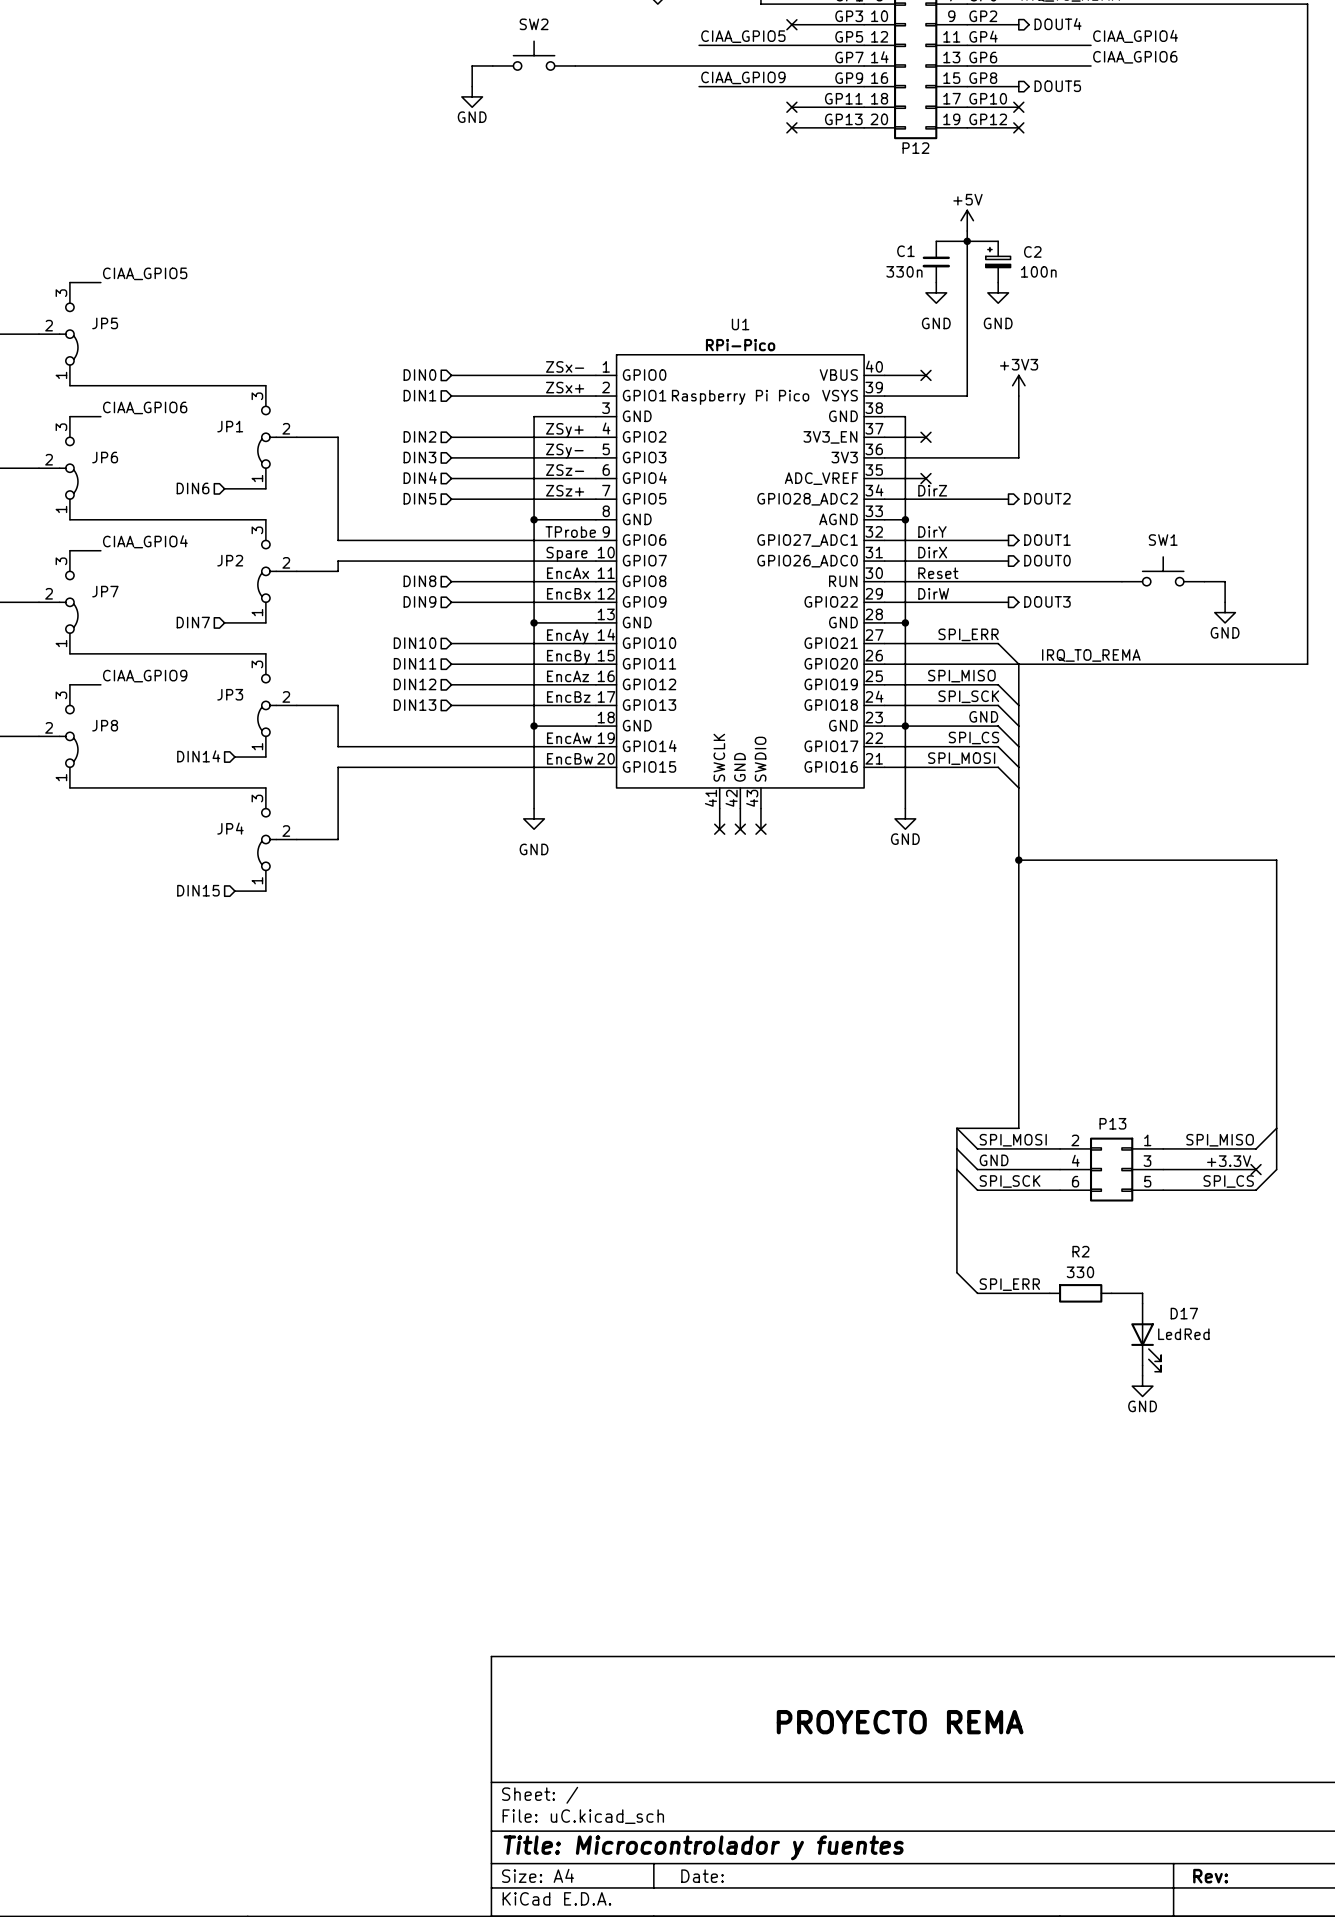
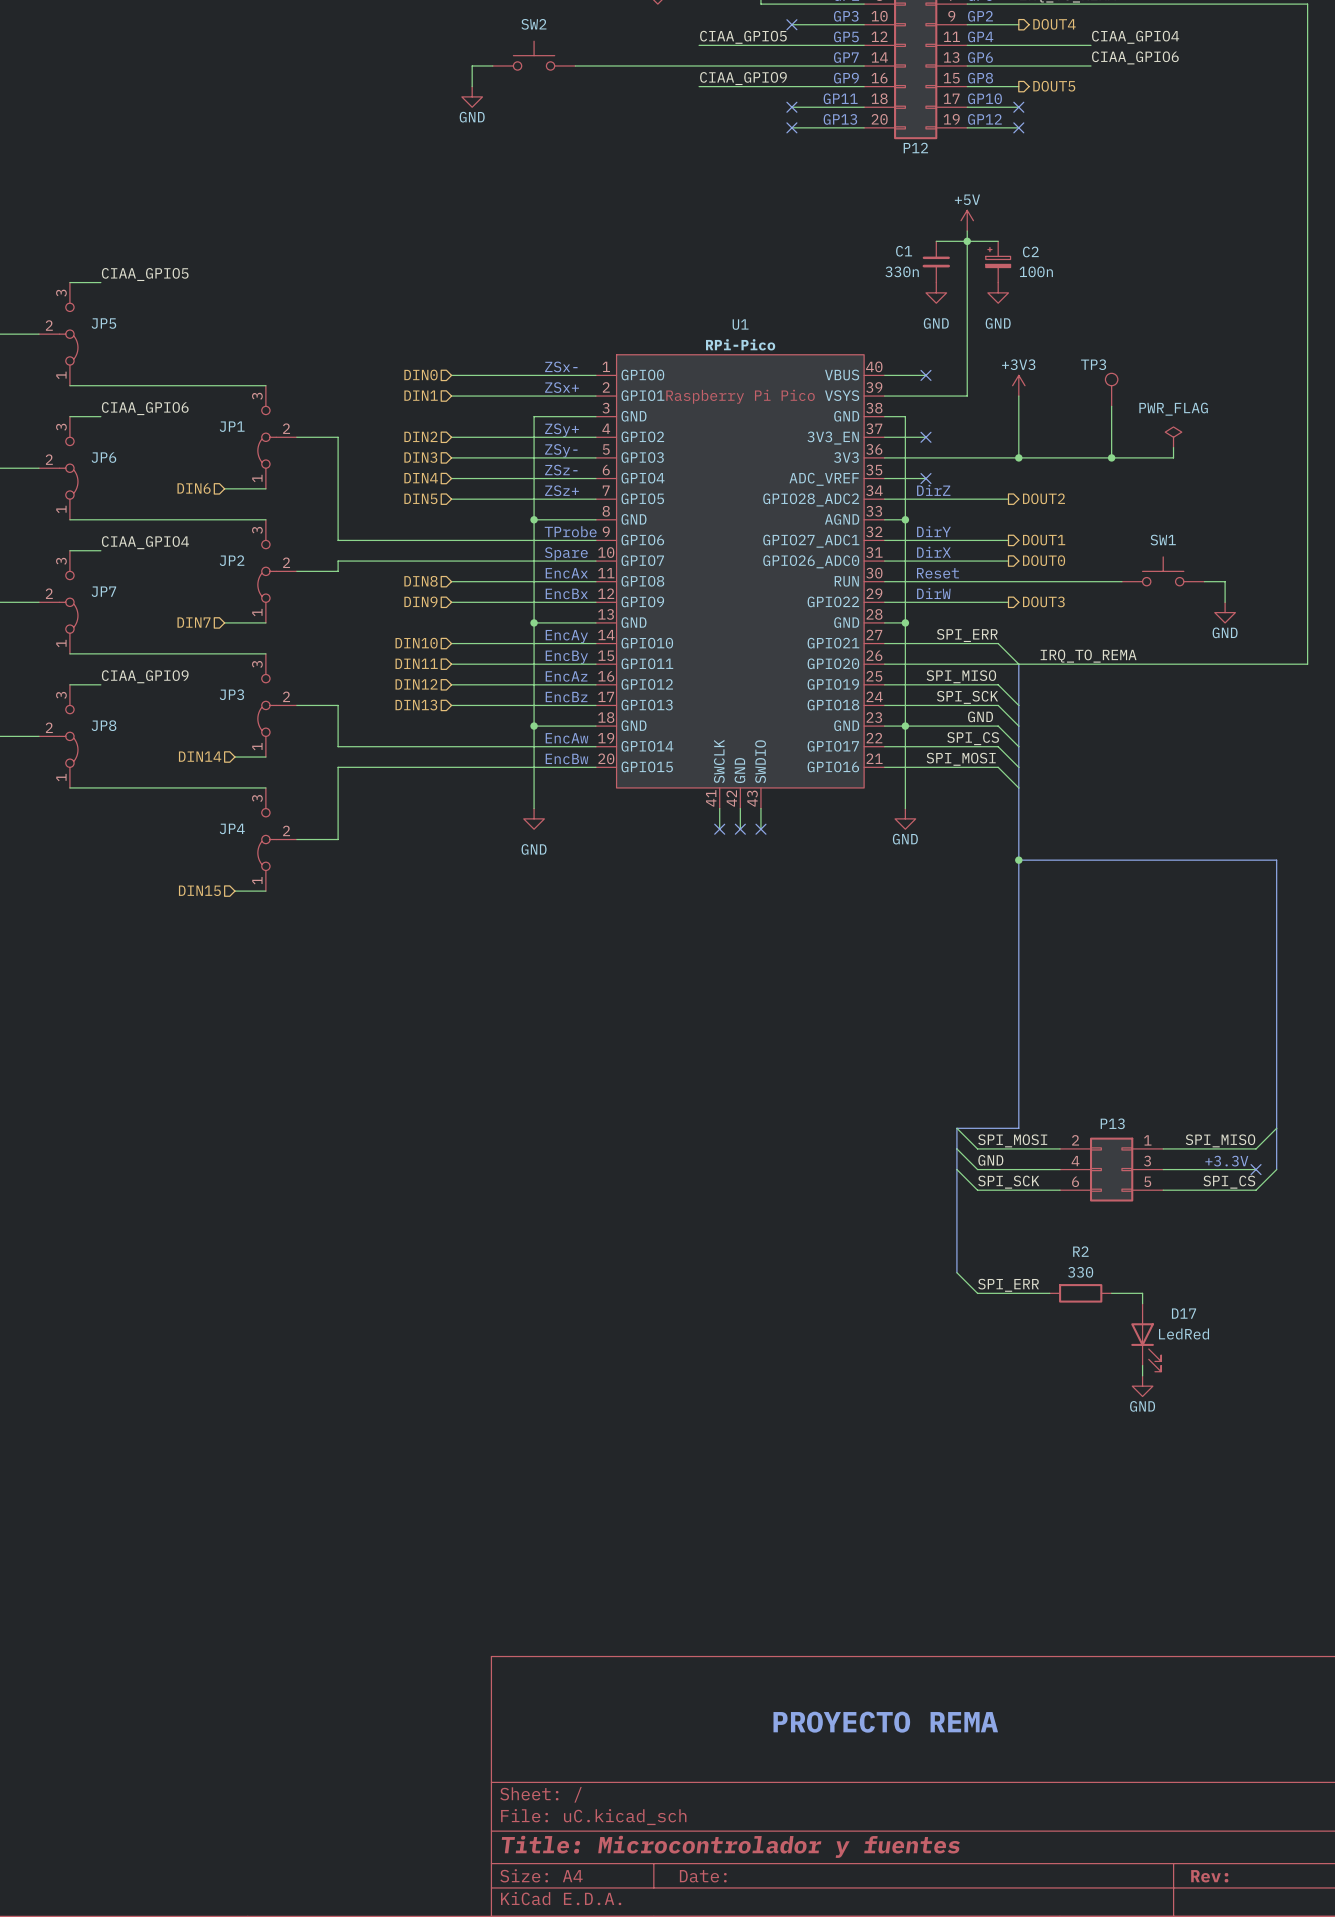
TP3: none -> (1111, 389)
wire: none -> (1111, 406) (1111, 457)
power symbol: none -> PWR_FLAG (1173, 437)
wire: none -> (1173, 447) (1173, 457) (1018, 457)
junction: none -> (1018, 457)
junction: none -> (1111, 457)

